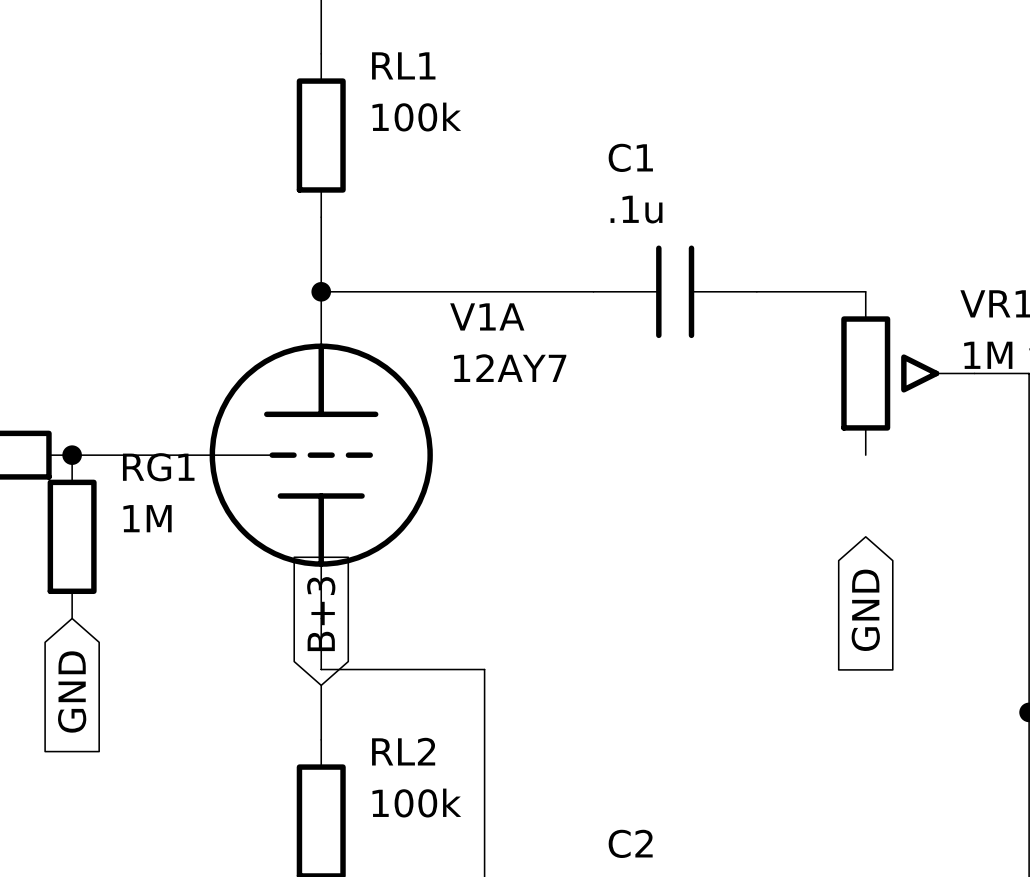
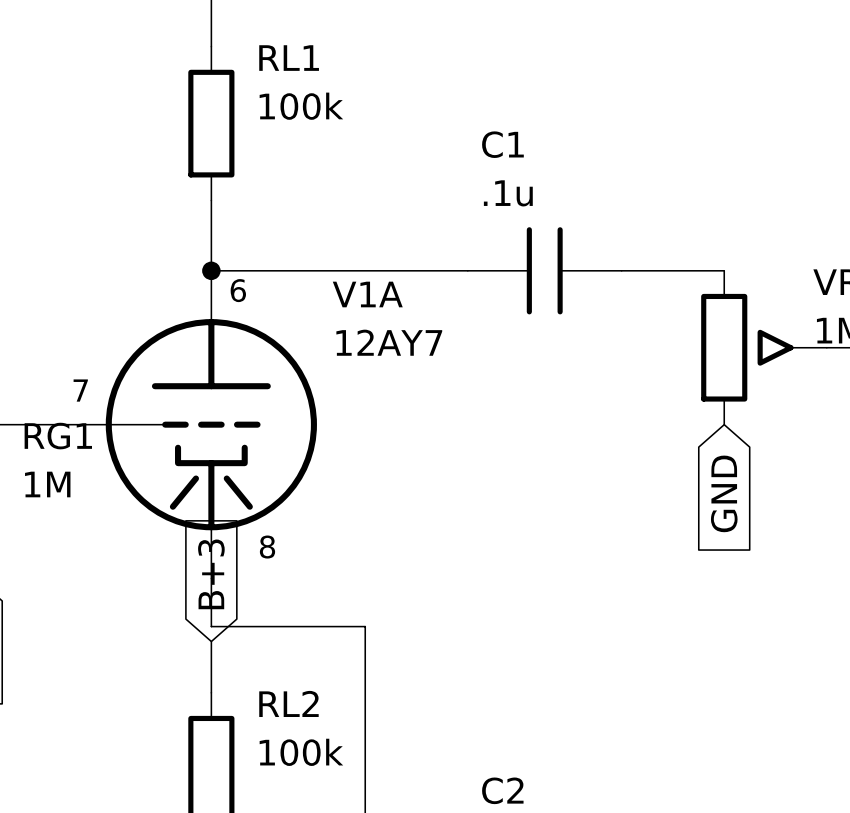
V1A symbol: [157, 291, 433, 619] -> [57, 270, 317, 579]
text: none -> 6 (238, 290)
text: none -> 7 (80, 390)
text: none -> 8 (267, 547)
global label position: GND (865, 610) -> GND (724, 493)

